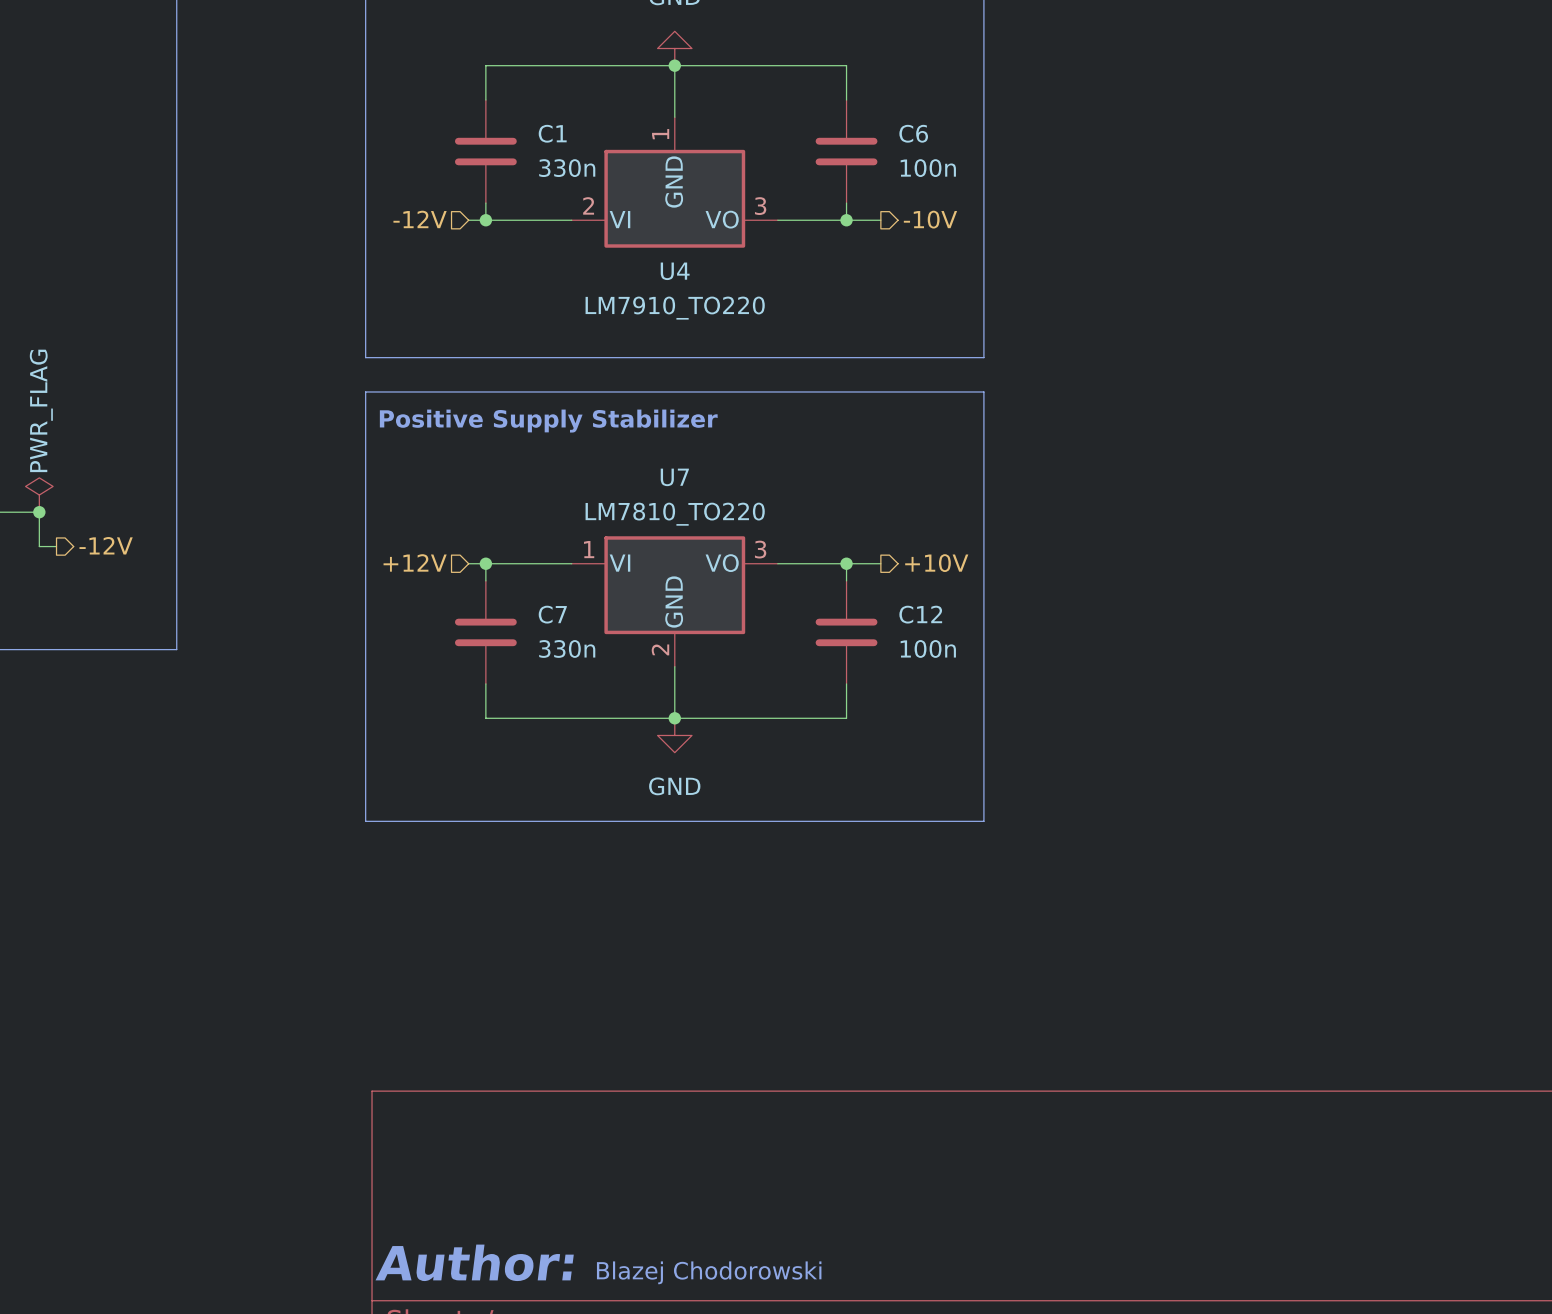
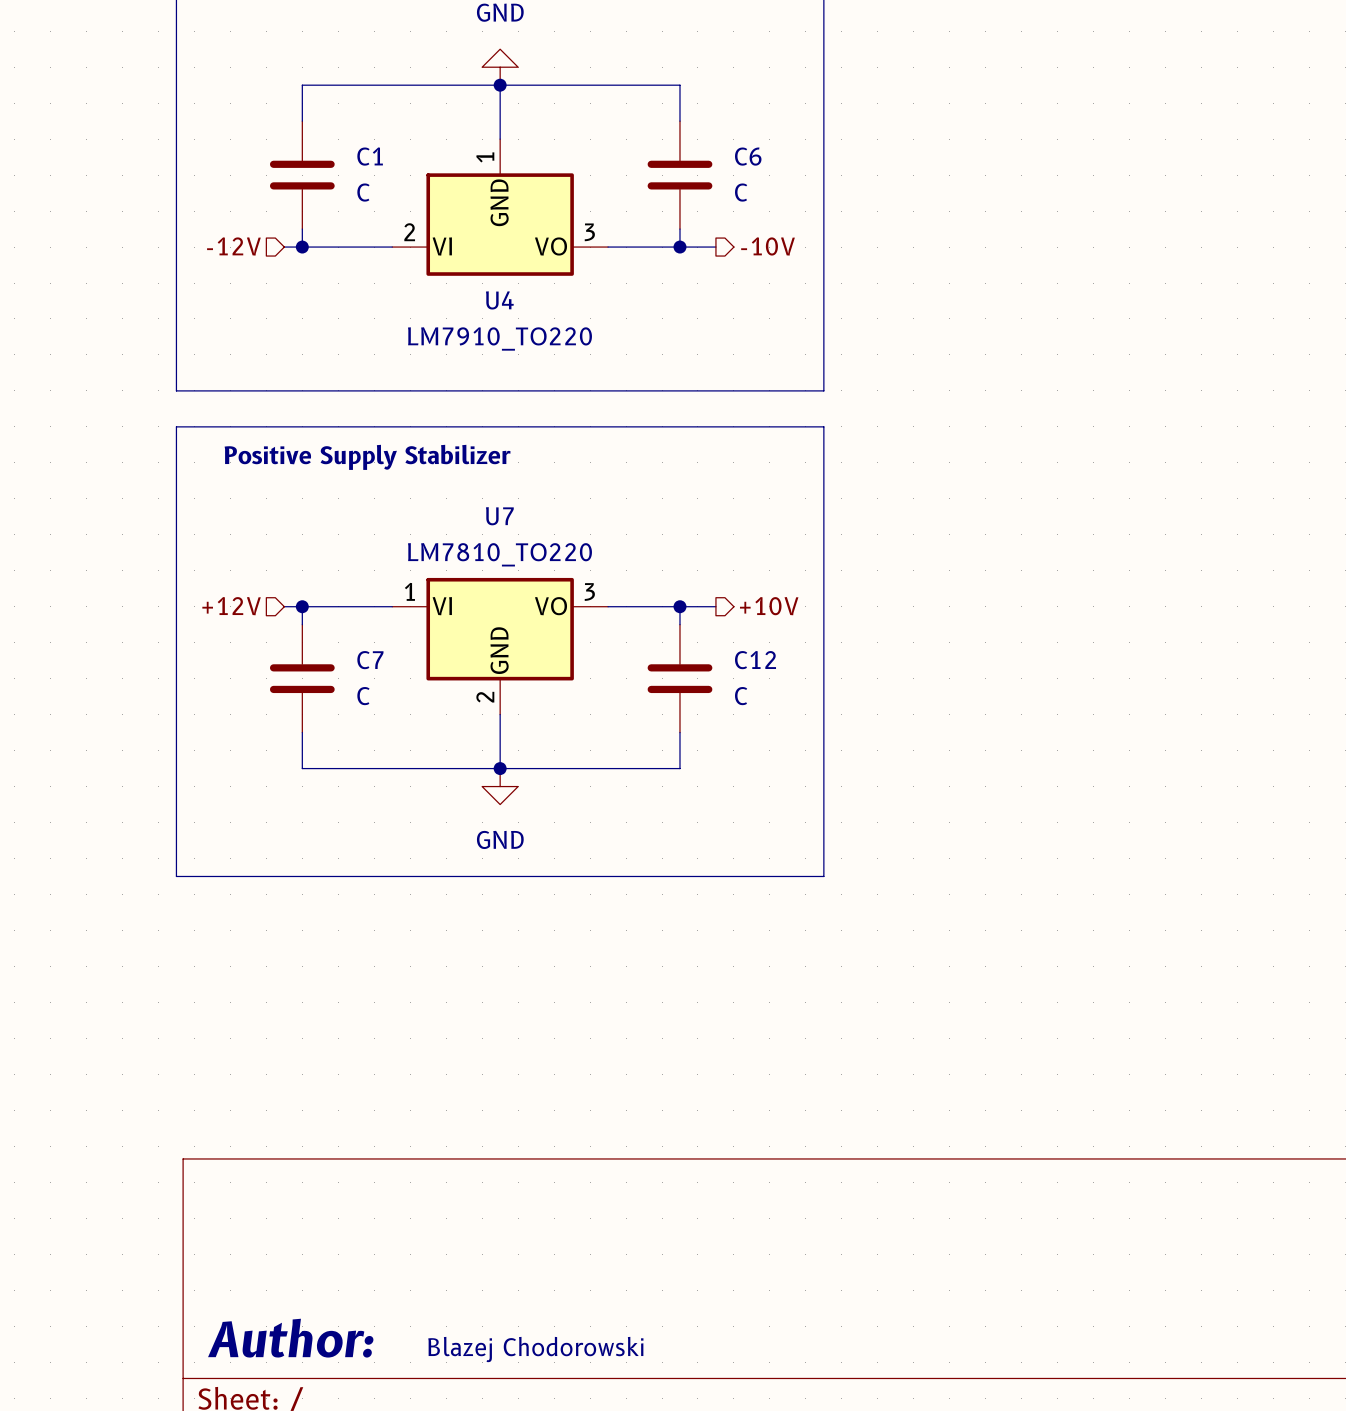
C1 value: 330n (567, 168) -> C (363, 192)
C6 value: 100n (928, 168) -> C (741, 192)
C7 value: 330n (567, 648) -> C (363, 696)
C12 value: 100n (928, 648) -> C (741, 696)

